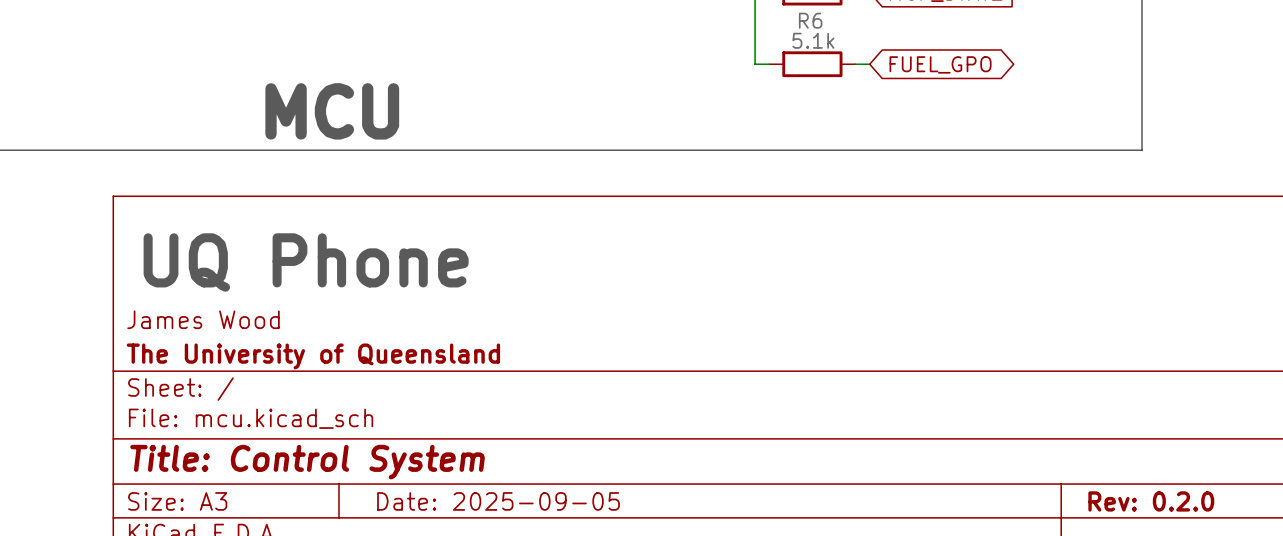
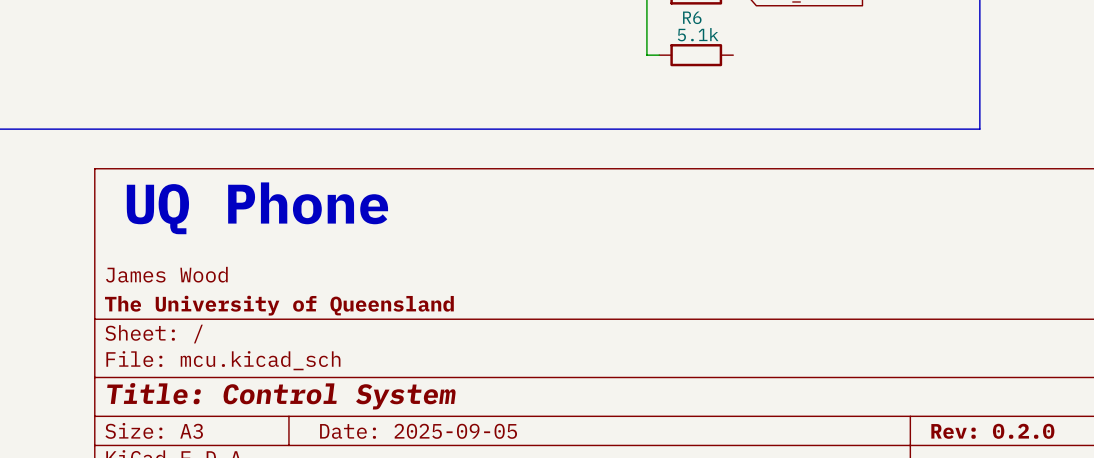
wire: (855, 64) (869, 64) -> none
global label: FUEL_GPO (940, 64) -> none
text: MCU (332, 111) -> none
text position: UQ Phone (306, 262) -> UQ Phone (257, 208)

